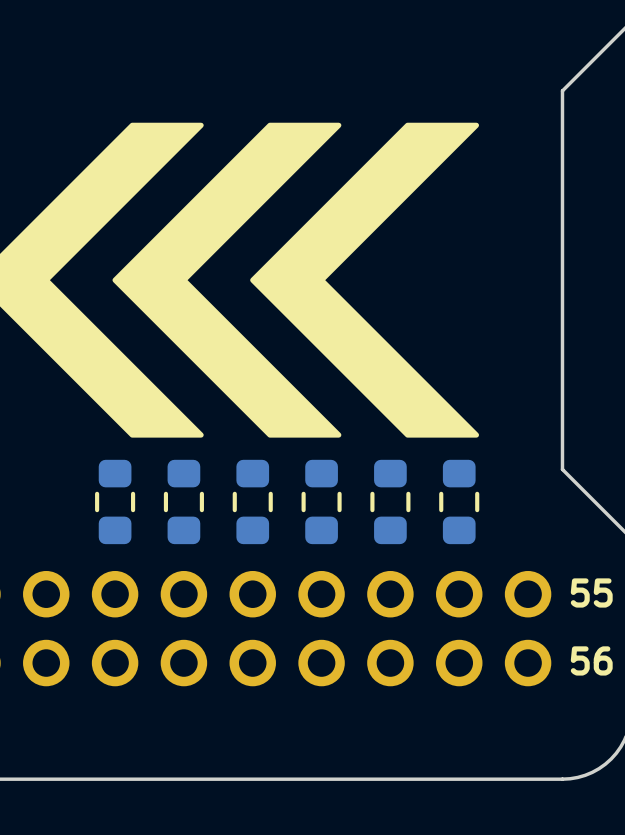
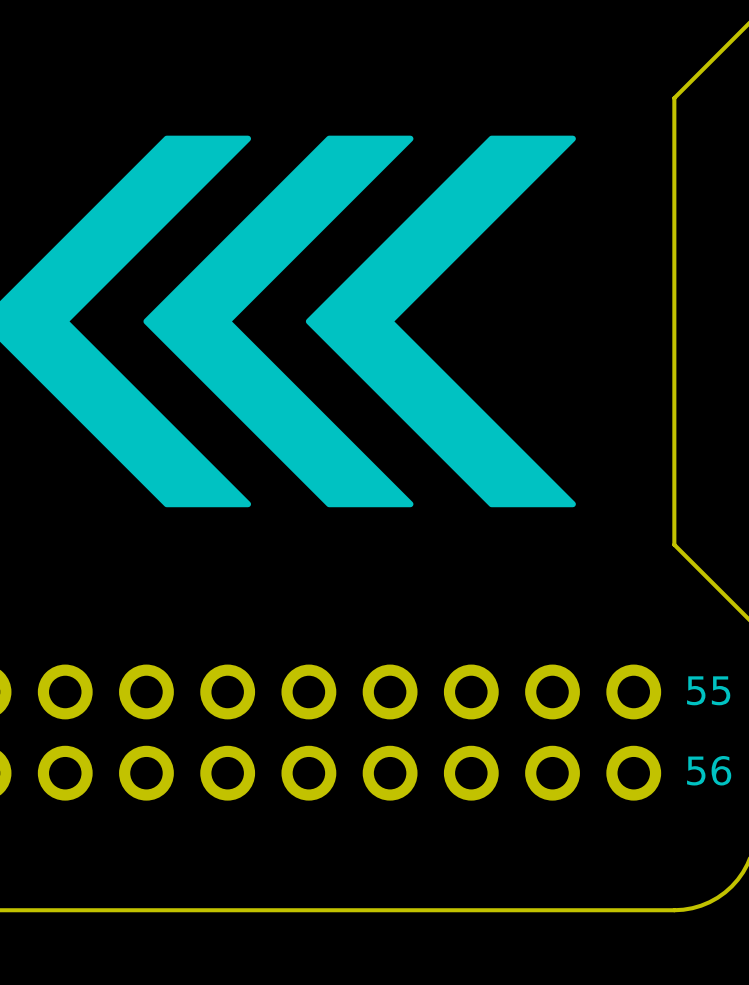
part: (115, 501) -> none
part: (183, 501) -> none
part: (252, 501) -> none
part: (321, 501) -> none
part: (390, 501) -> none
part: (459, 501) -> none

